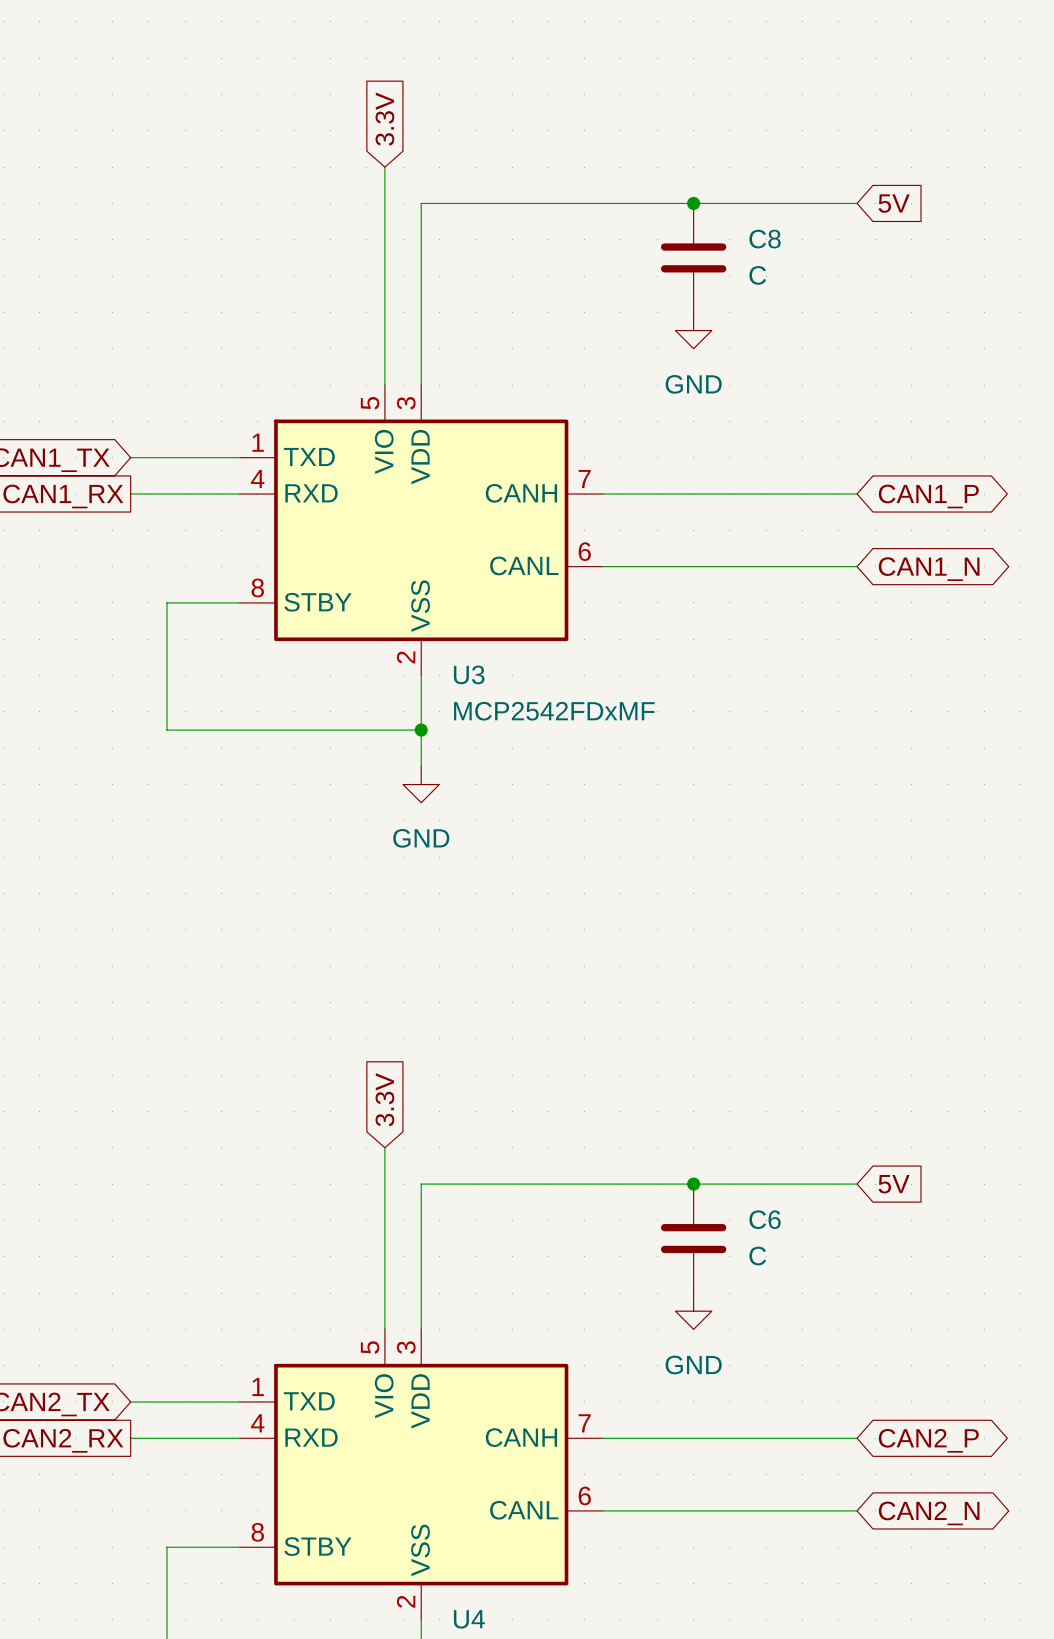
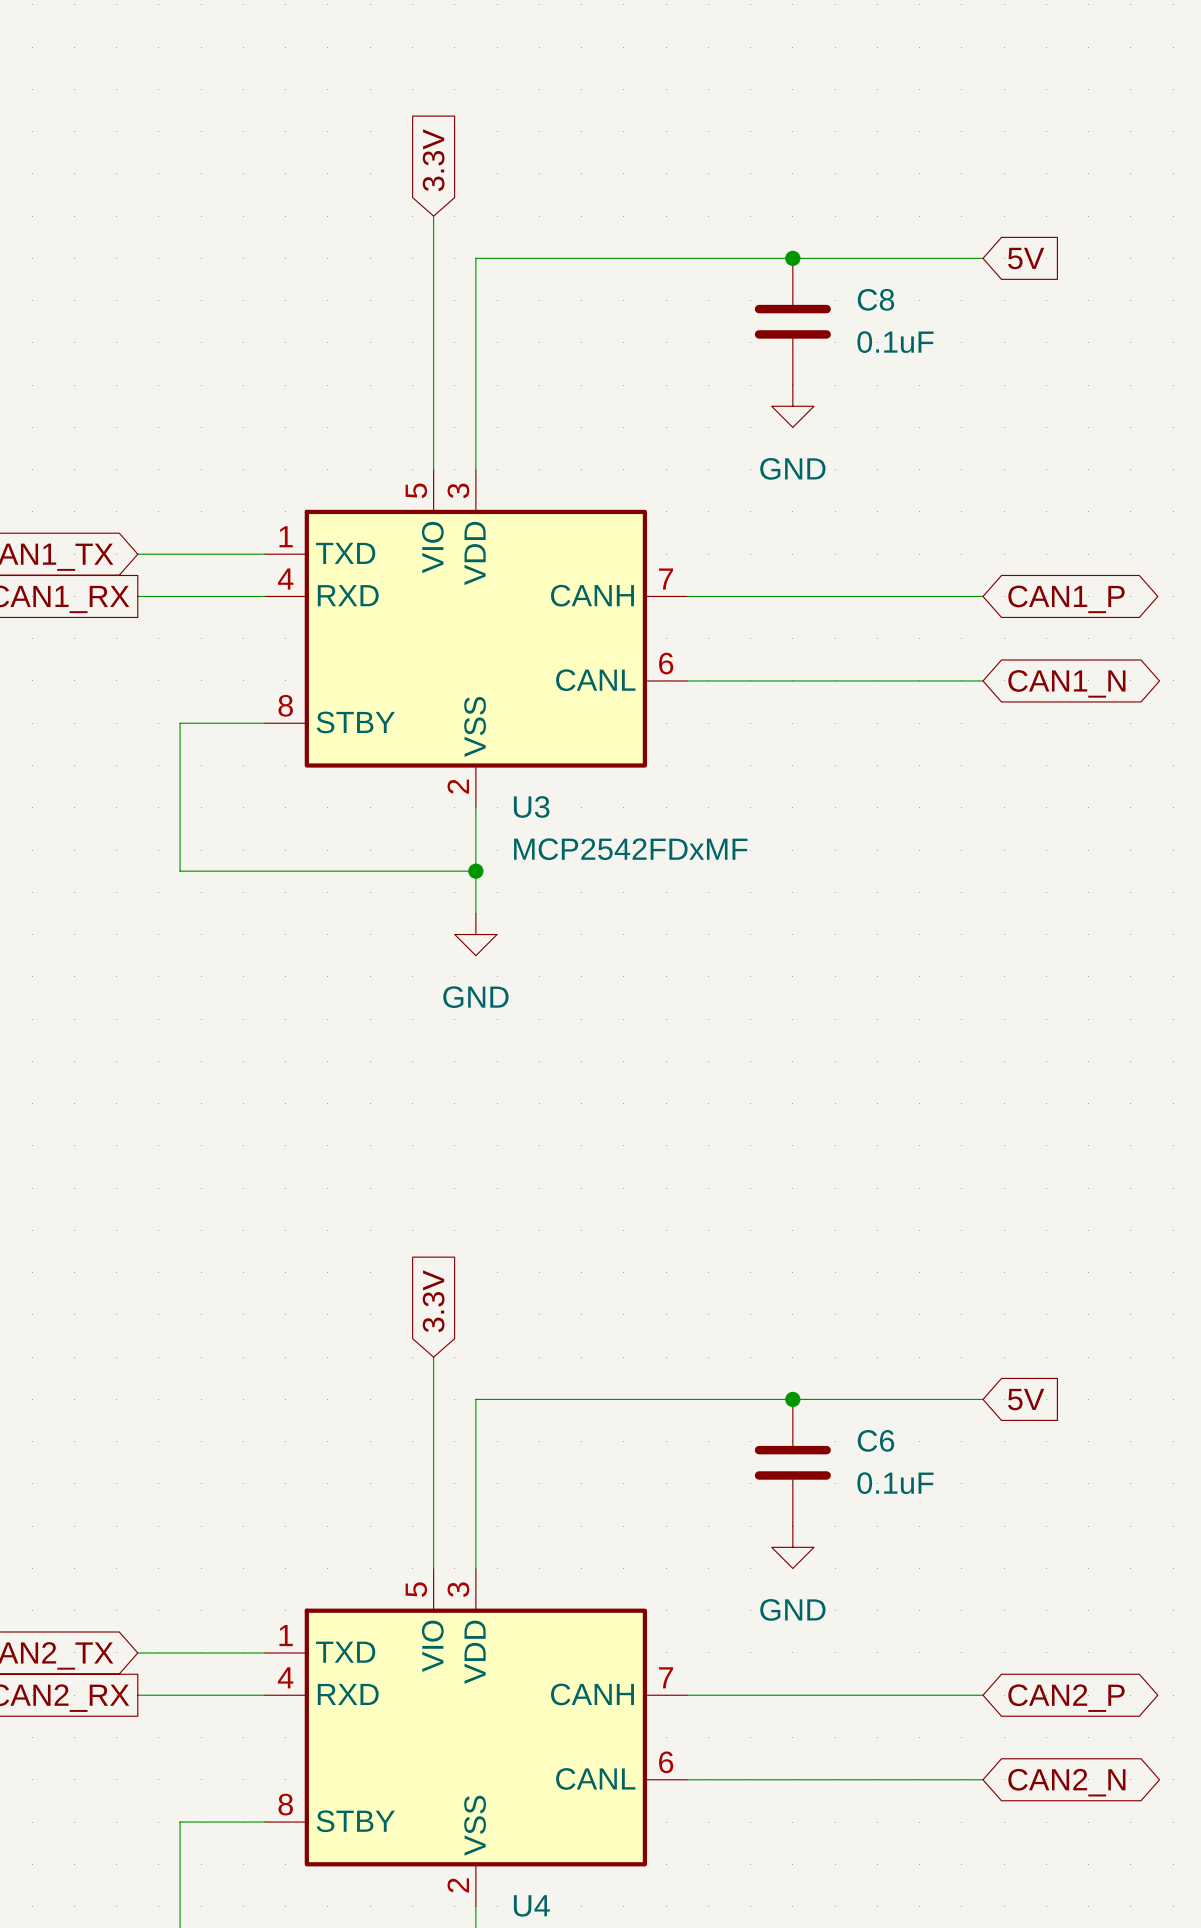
C8 value: C (757, 275) -> 0.1uF (895, 342)
C6 value: C (757, 1256) -> 0.1uF (895, 1483)

